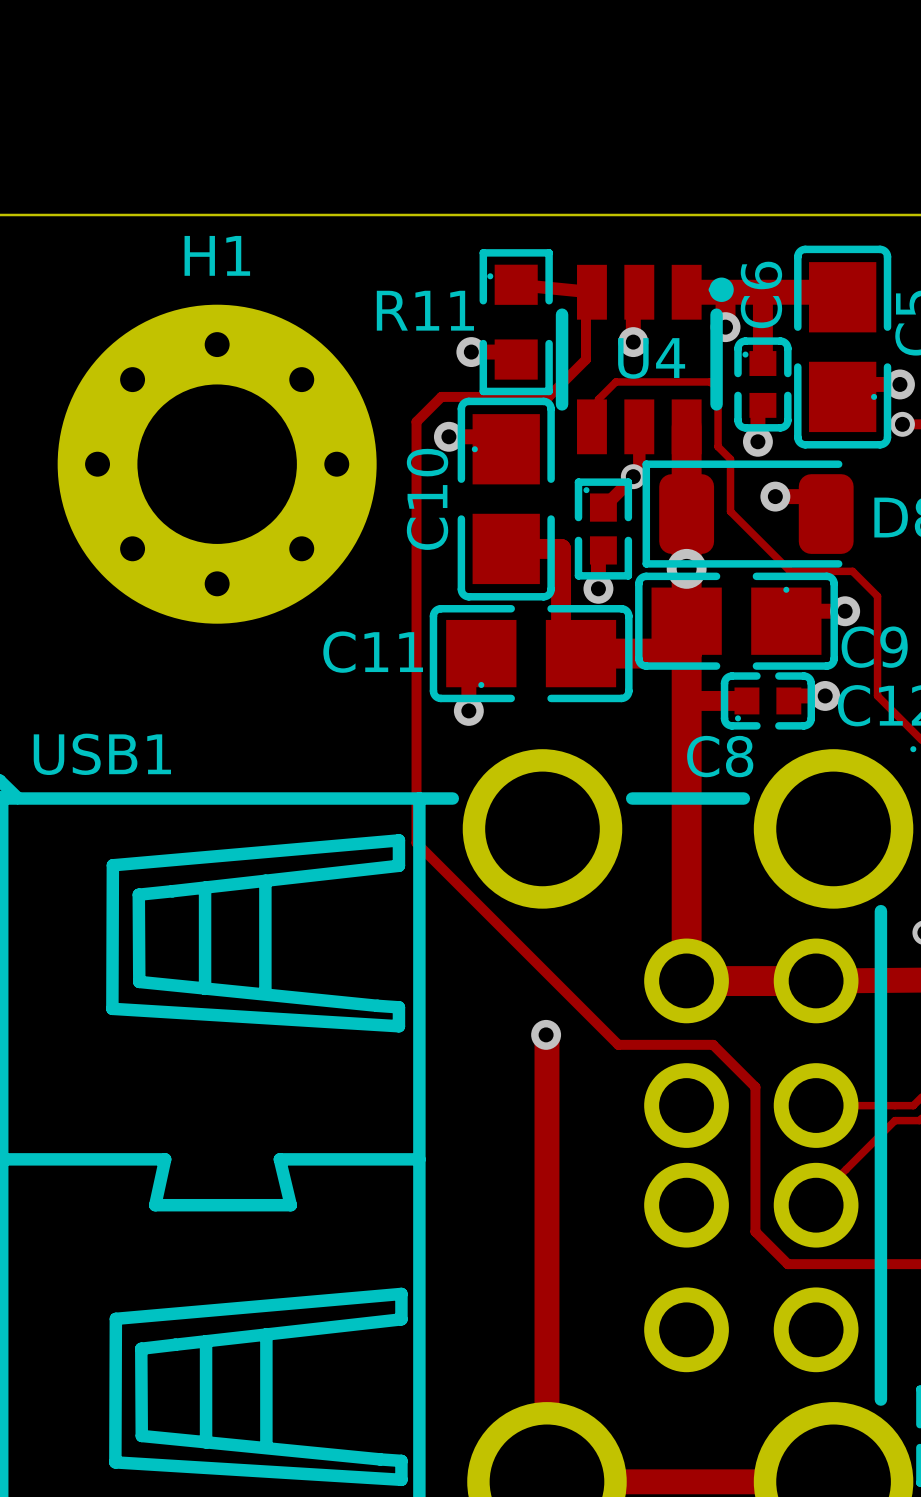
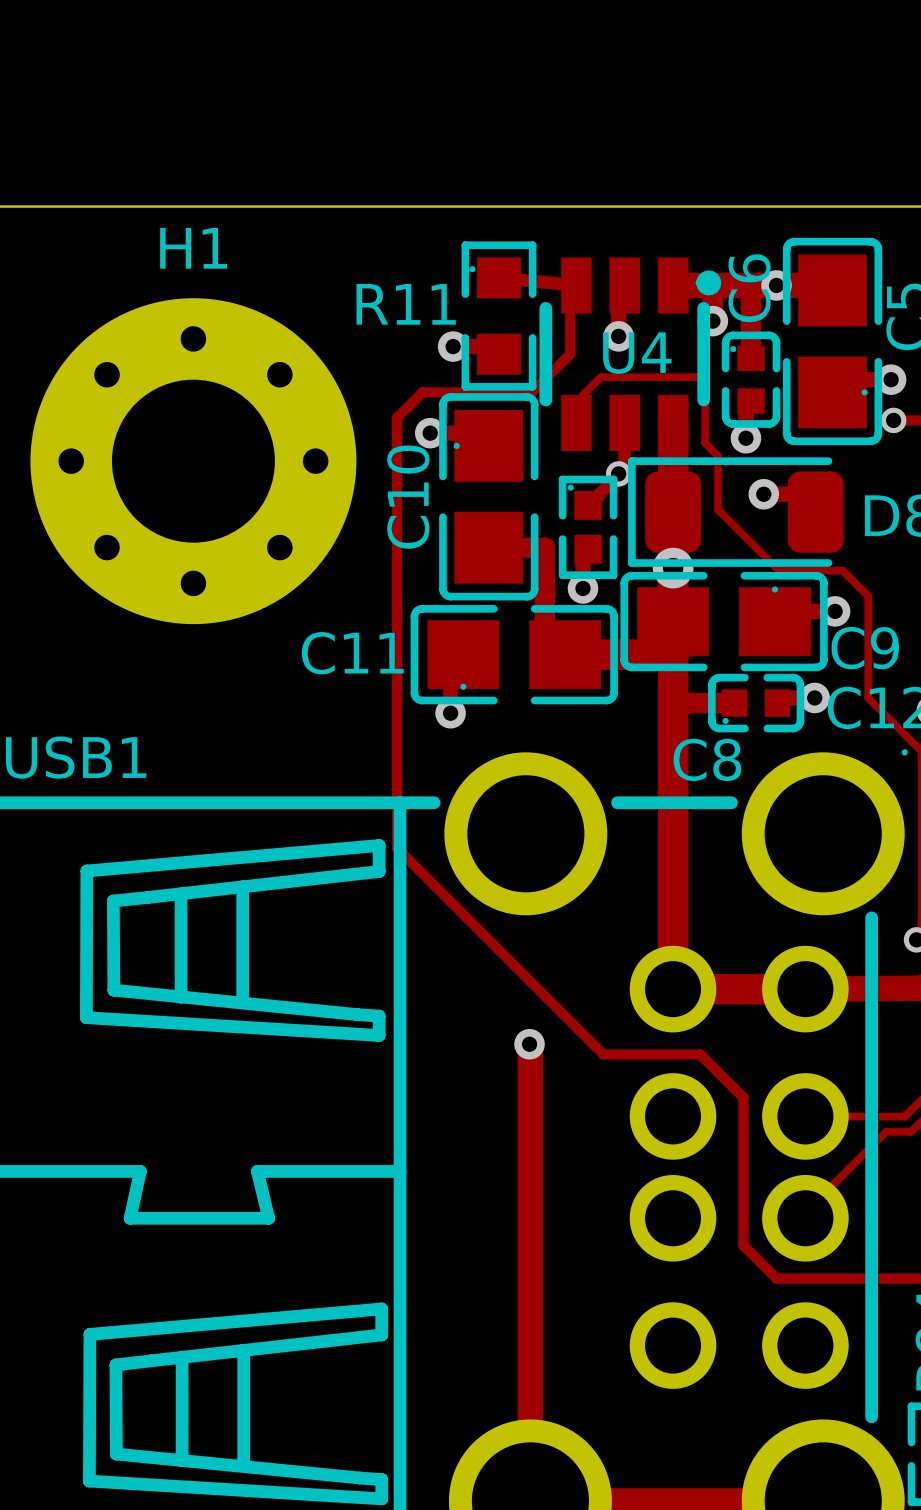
via: none -> (776, 285)

